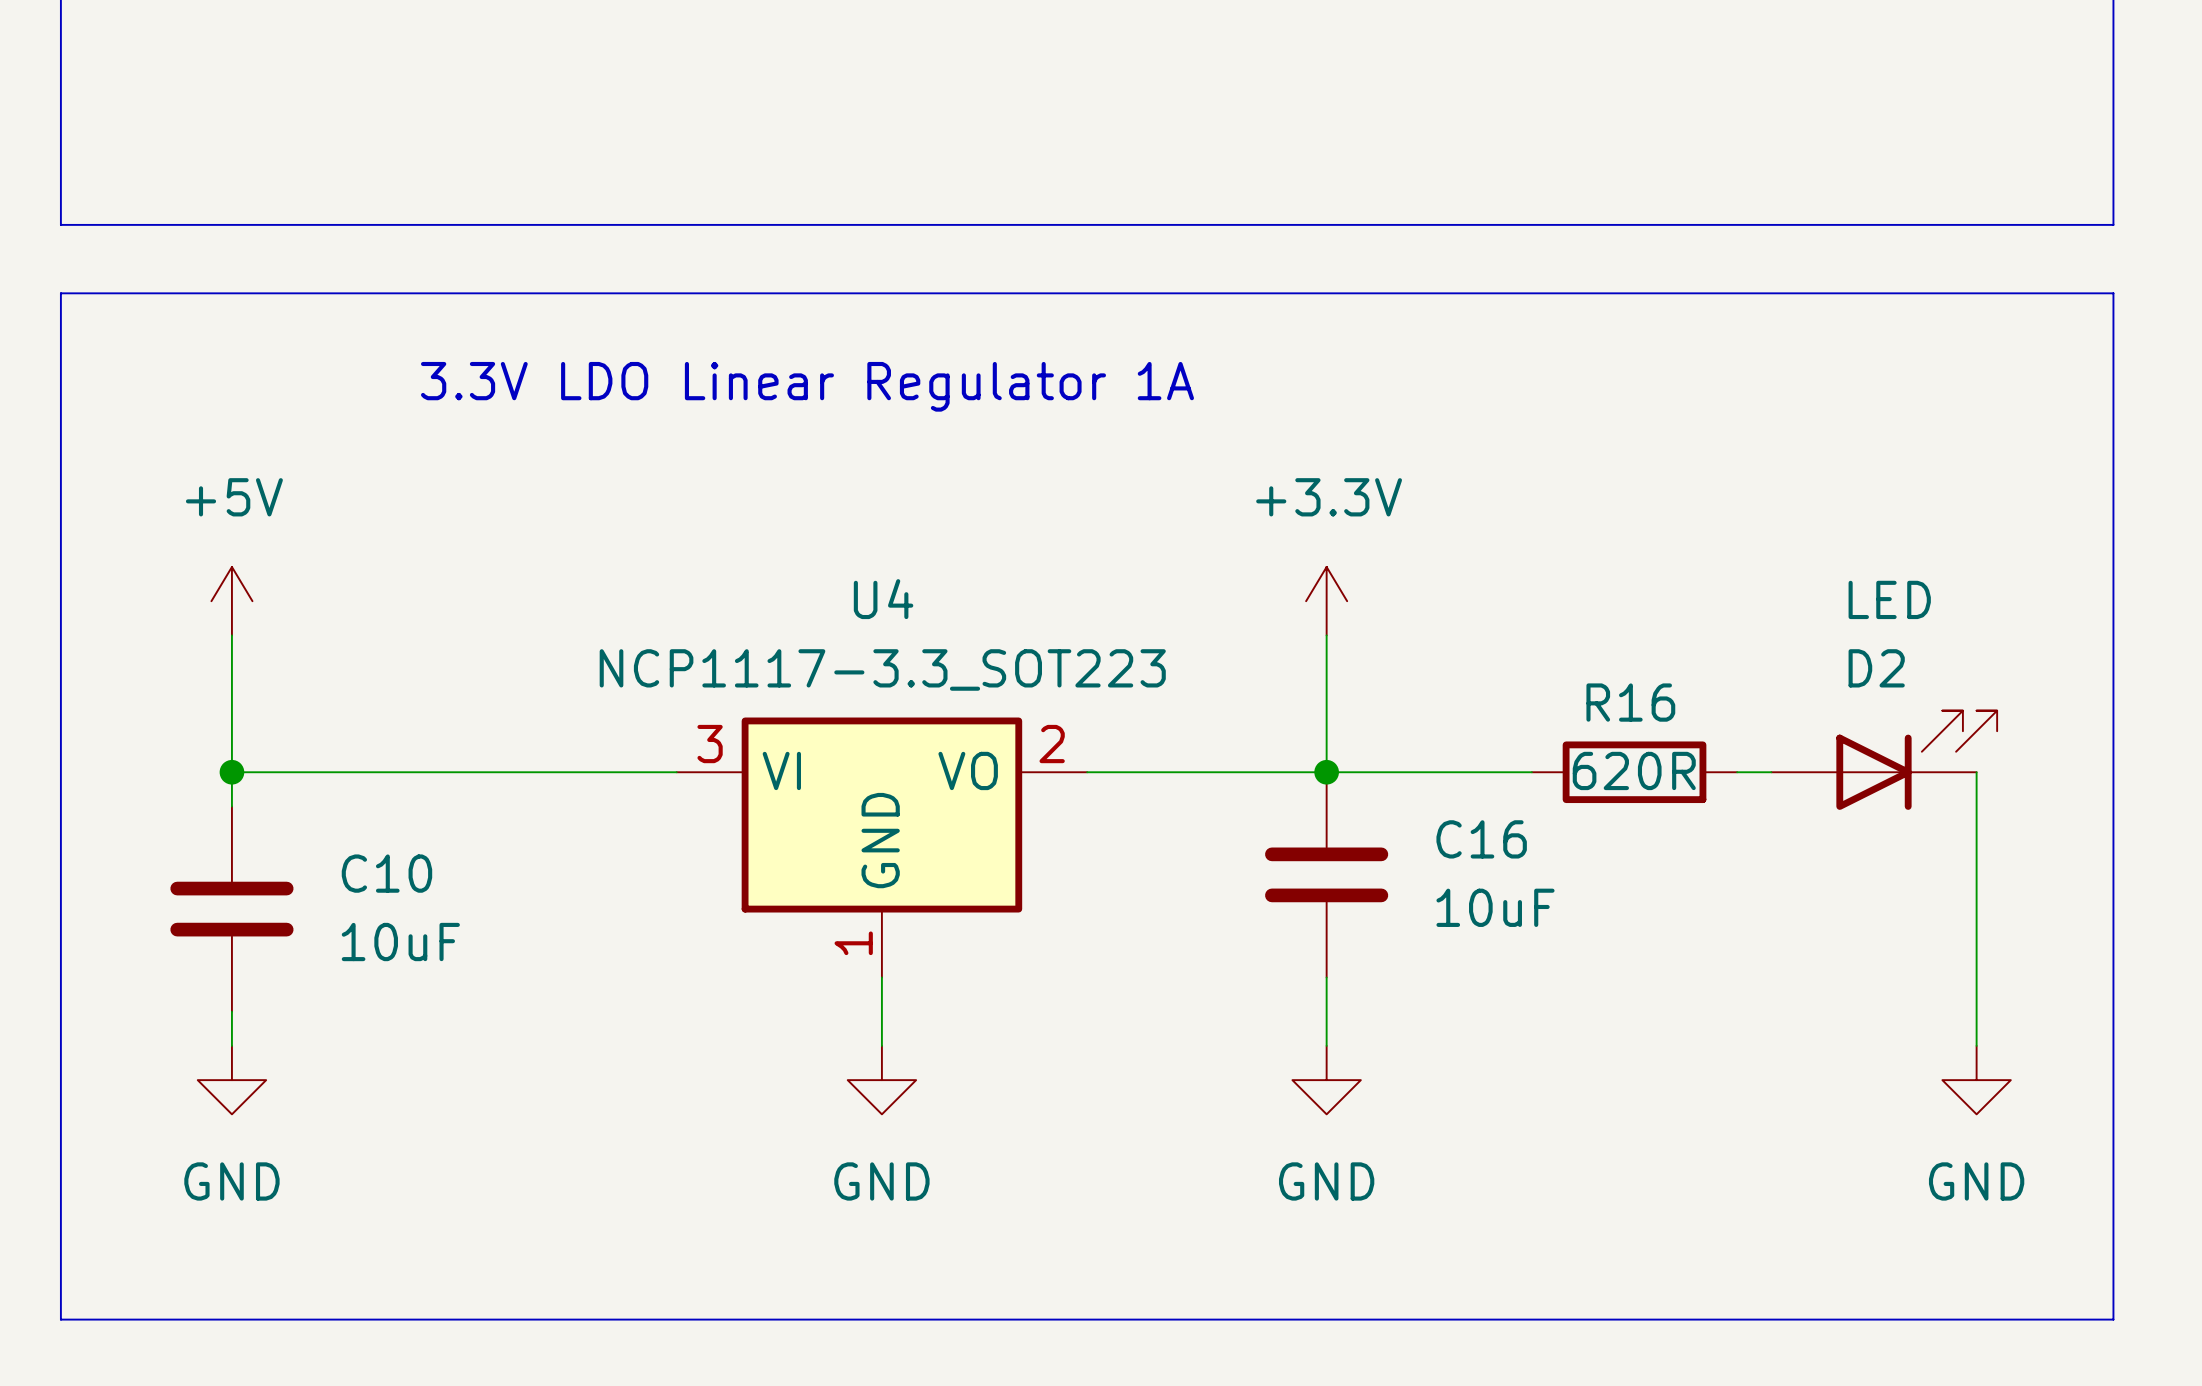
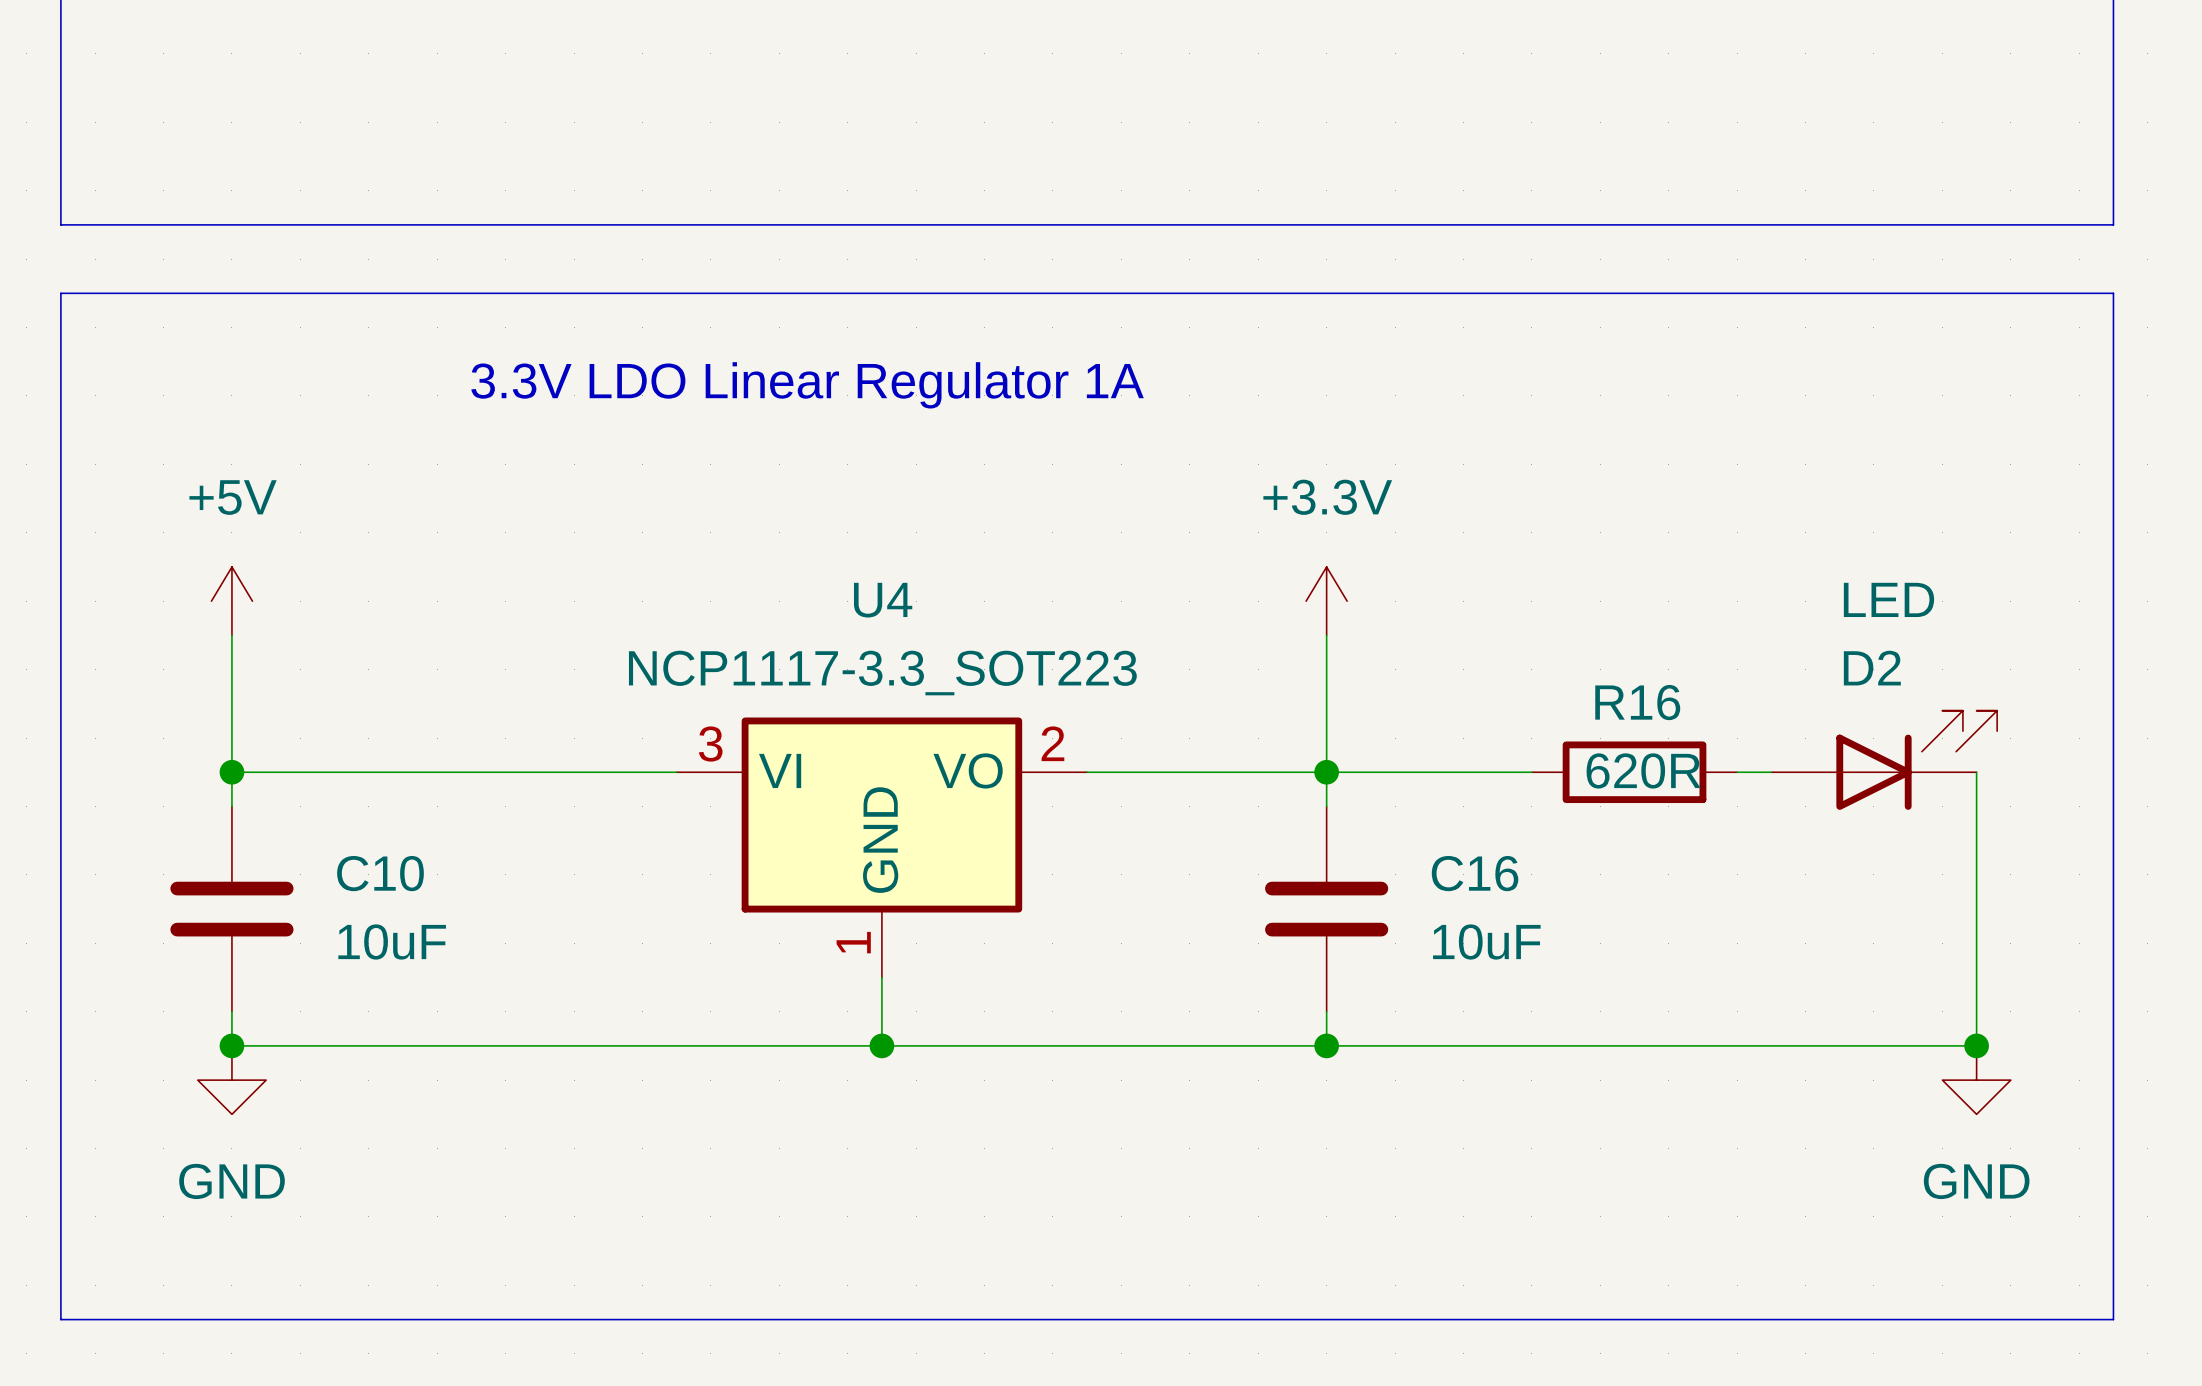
C16 position: (1326, 874) -> (1326, 909)
wire: none -> (231, 1045) (1976, 1045)
junction: none -> (231, 1045)
junction: none -> (881, 1045)
junction: none -> (1326, 1045)
junction: none -> (1976, 1045)
power symbol: GND (881, 1080) -> none
power symbol: GND (1326, 1080) -> none

